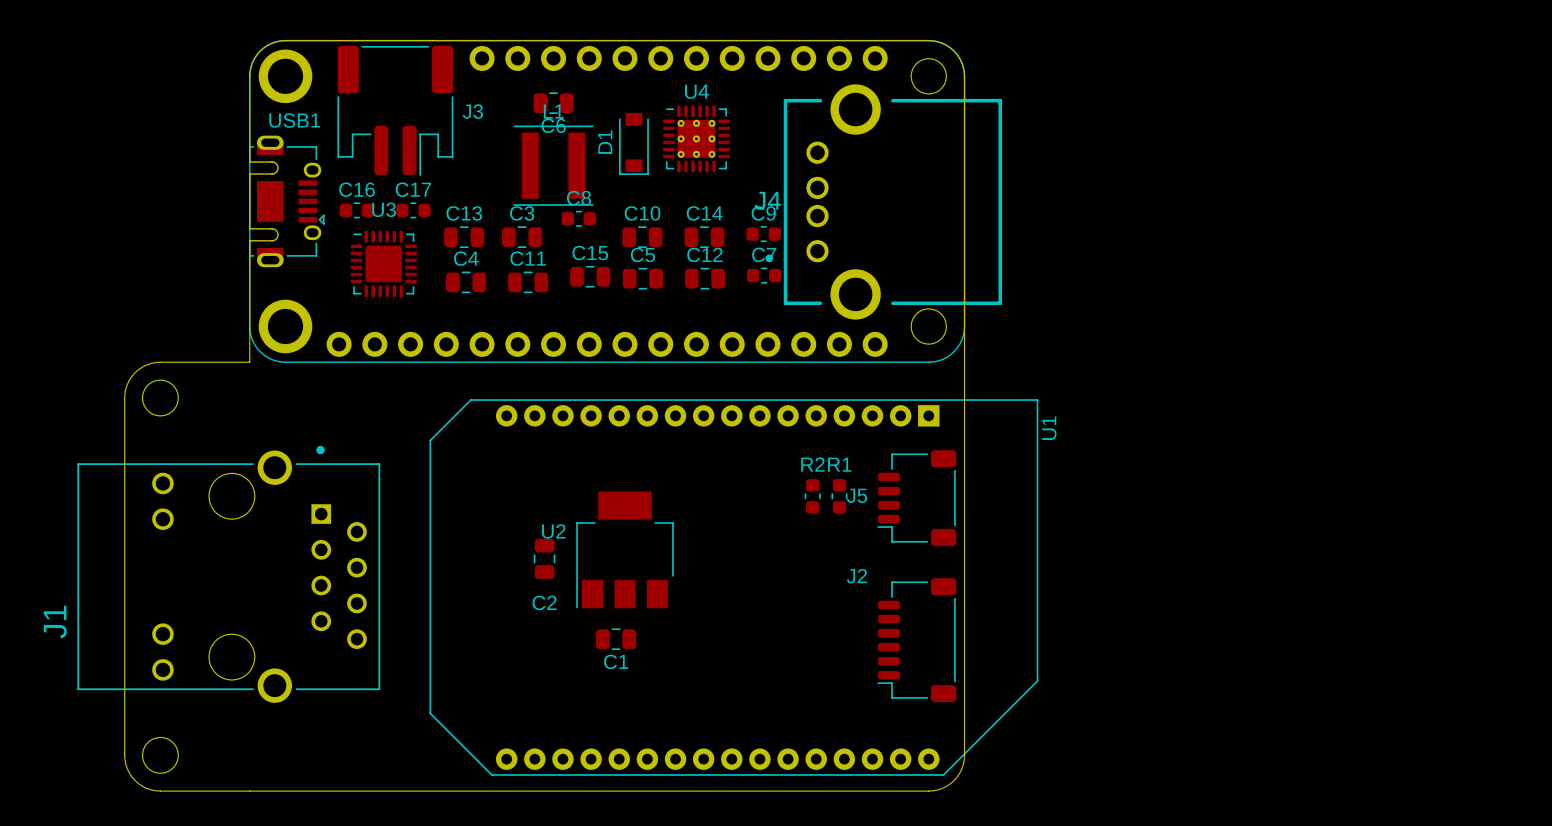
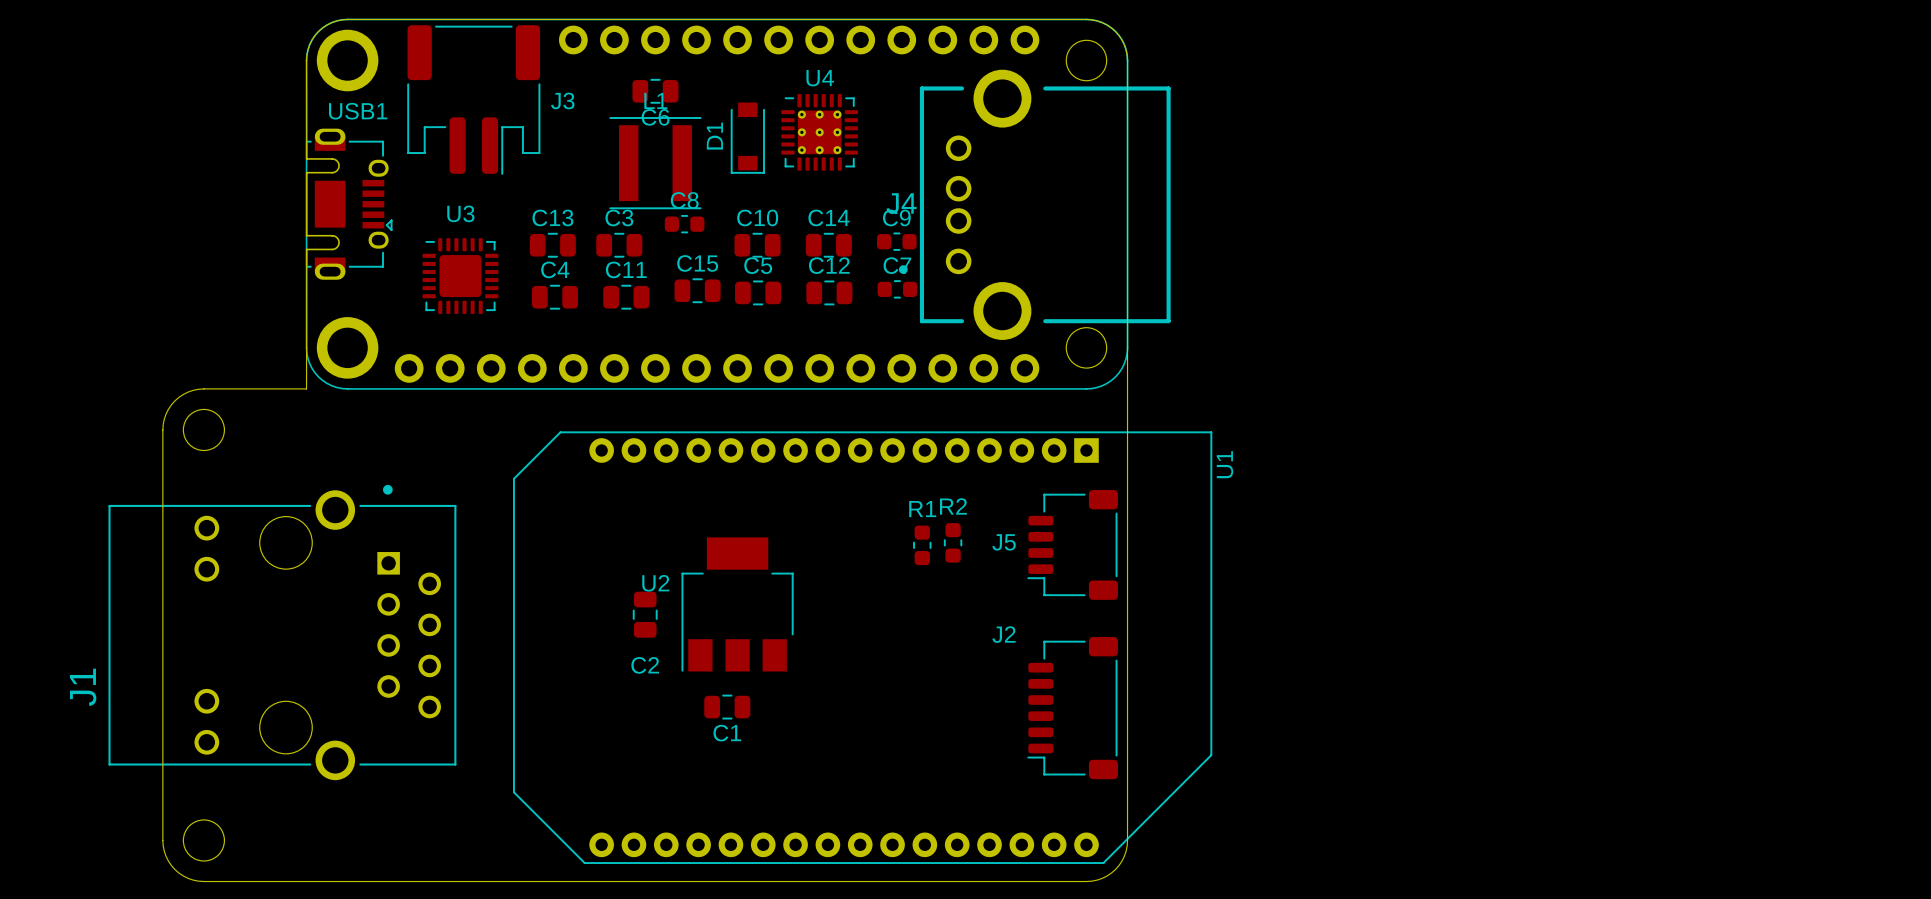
C16: (356, 210) -> none
C17: (413, 210) -> none
R1 position: (839, 496) -> (922, 545)

